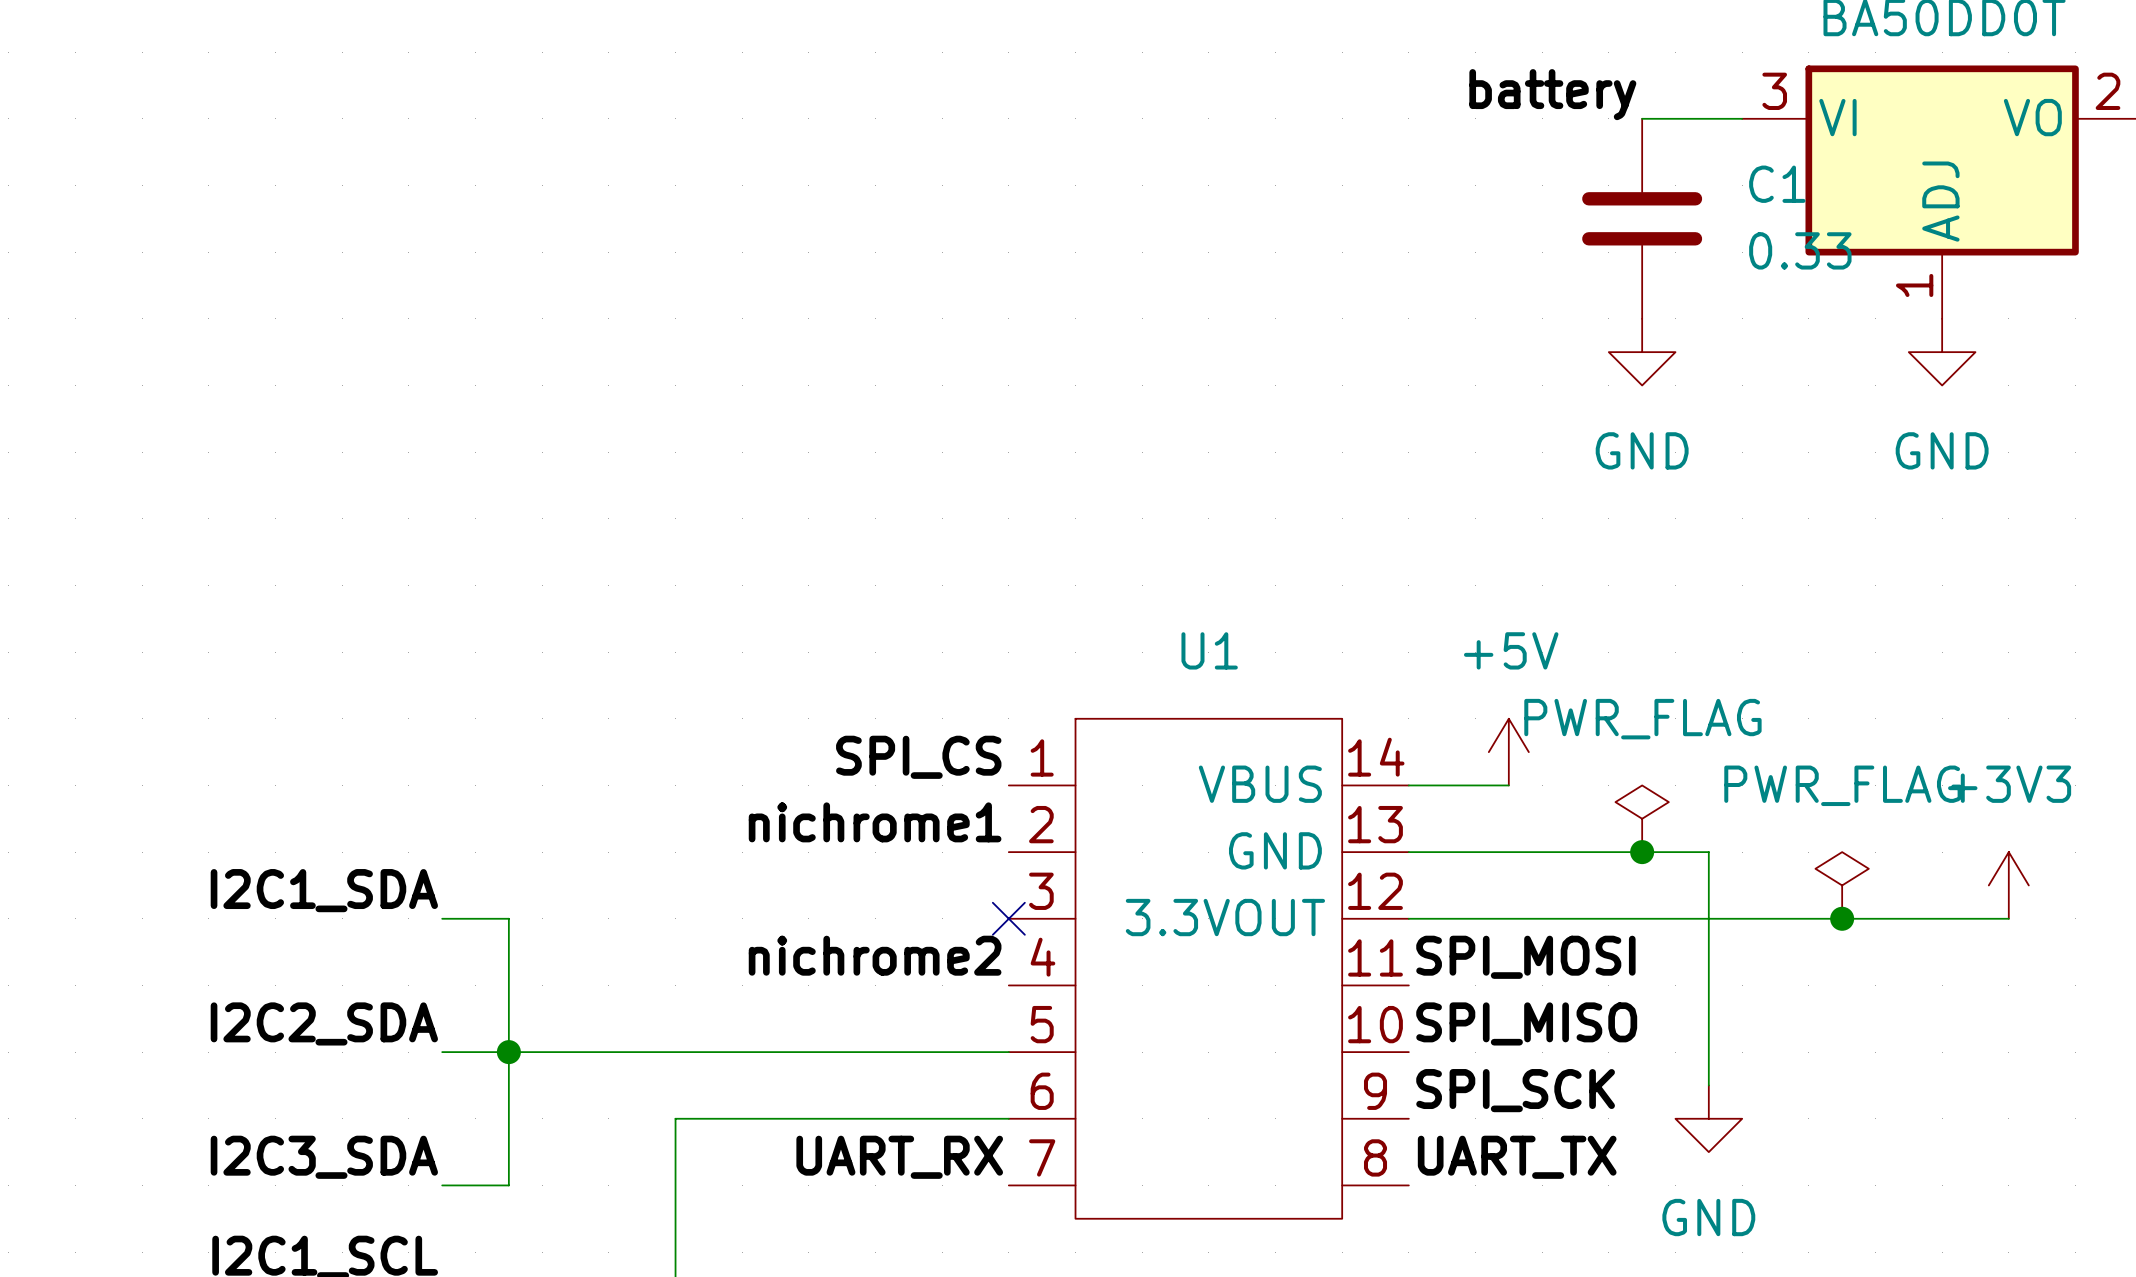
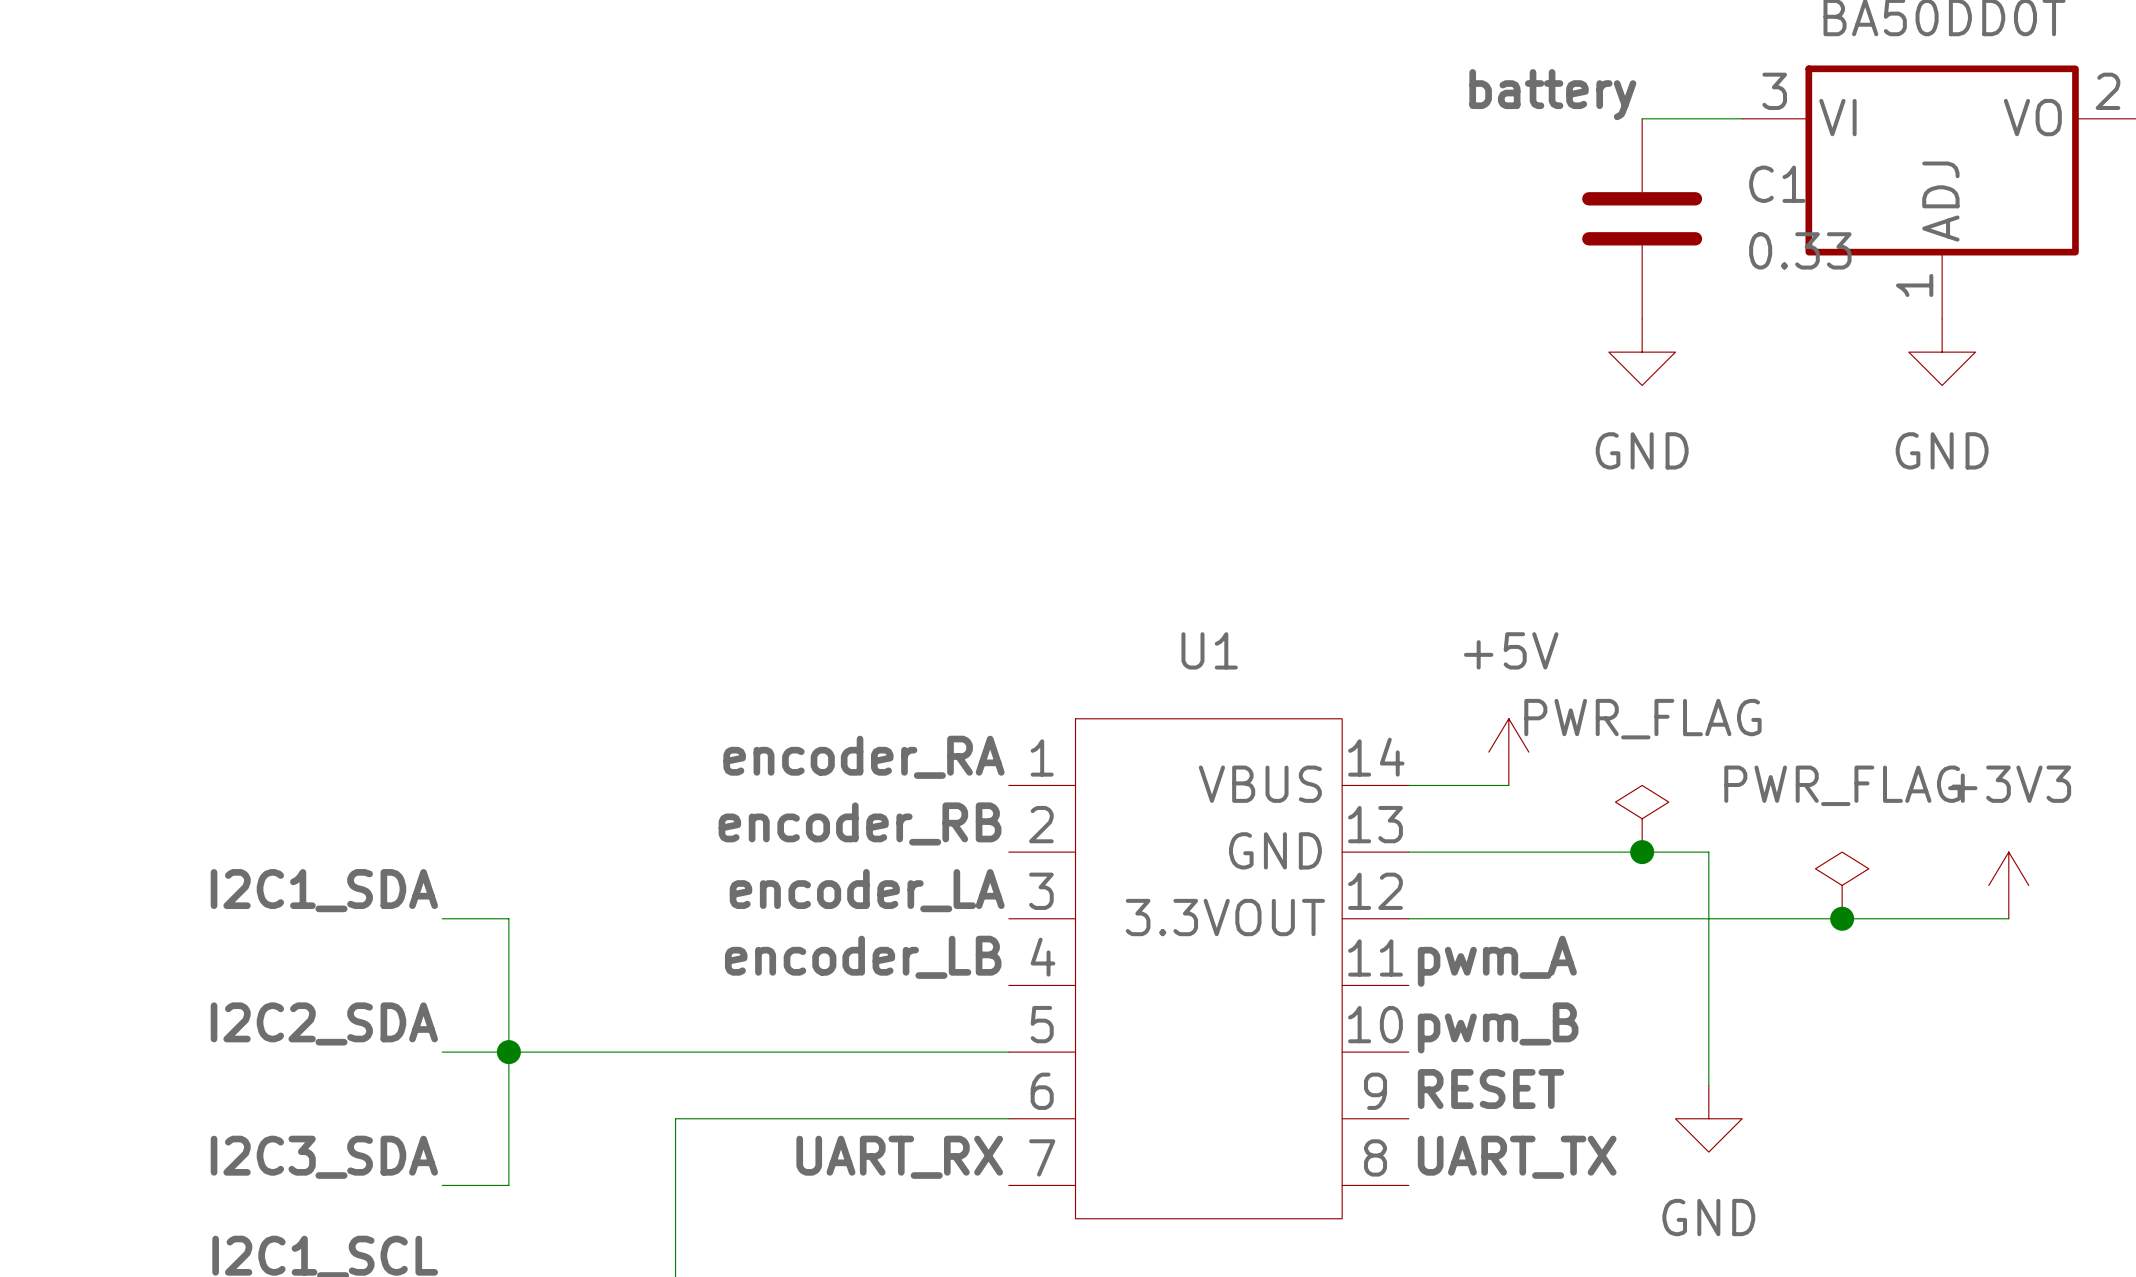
label: SPI_CS (918, 757) -> encoder_RA (864, 757)
label: nichrome1 (875, 822) -> encoder_RB (860, 823)
label: none -> encoder_LA (867, 890)
no-connect mark: (1008, 918) -> none
label: nichrome2 (875, 955) -> encoder_LB (863, 957)
label: SPI_MOSI (1525, 957) -> pwm_A (1497, 961)
label: SPI_MISO (1526, 1023) -> pwm_B (1498, 1027)
label: SPI_SCK (1515, 1090) -> RESET (1490, 1089)

